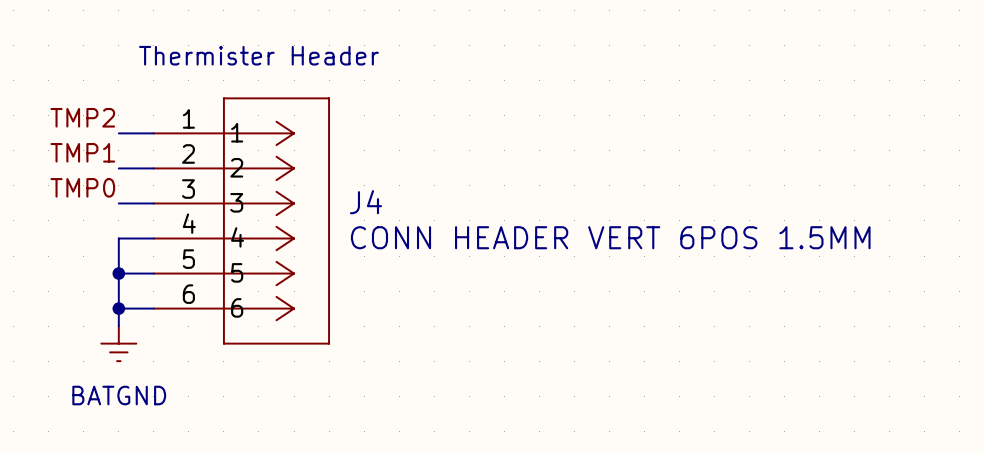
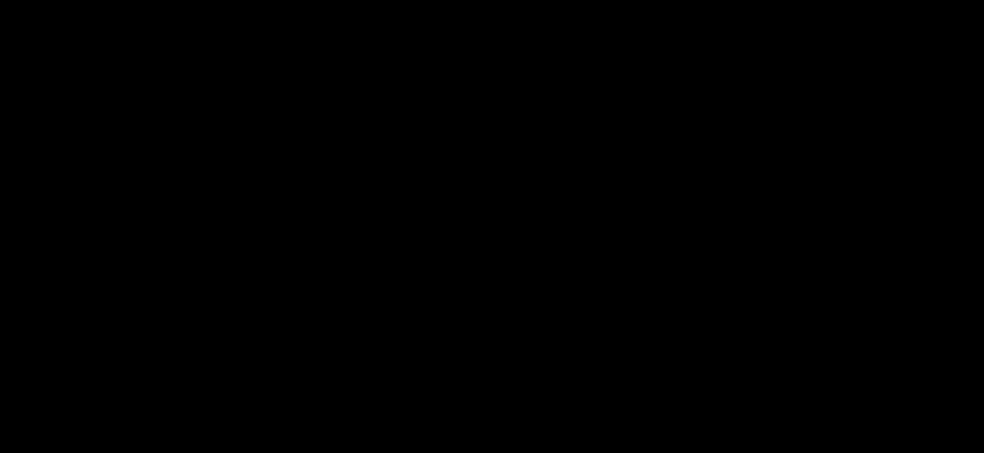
text: Thermister Header (258, 55) -> none
label: TMP2 (82, 117) -> none
wire: (118, 133) (153, 133) -> none
label: TMP1 (82, 152) -> none
wire: (118, 168) (153, 168) -> none
label: TMP0 (82, 187) -> none
wire: (118, 203) (153, 203) -> none
J4: CONN HEADER VERT 6POS 1.5MM (241, 220) -> none
wire: (153, 238) (118, 238) (118, 326) -> none
wire: (118, 273) (153, 273) -> none
junction: (118, 273) -> none
wire: (118, 308) (153, 308) -> none
junction: (118, 308) -> none
power symbol: BATGND (118, 343) -> none

